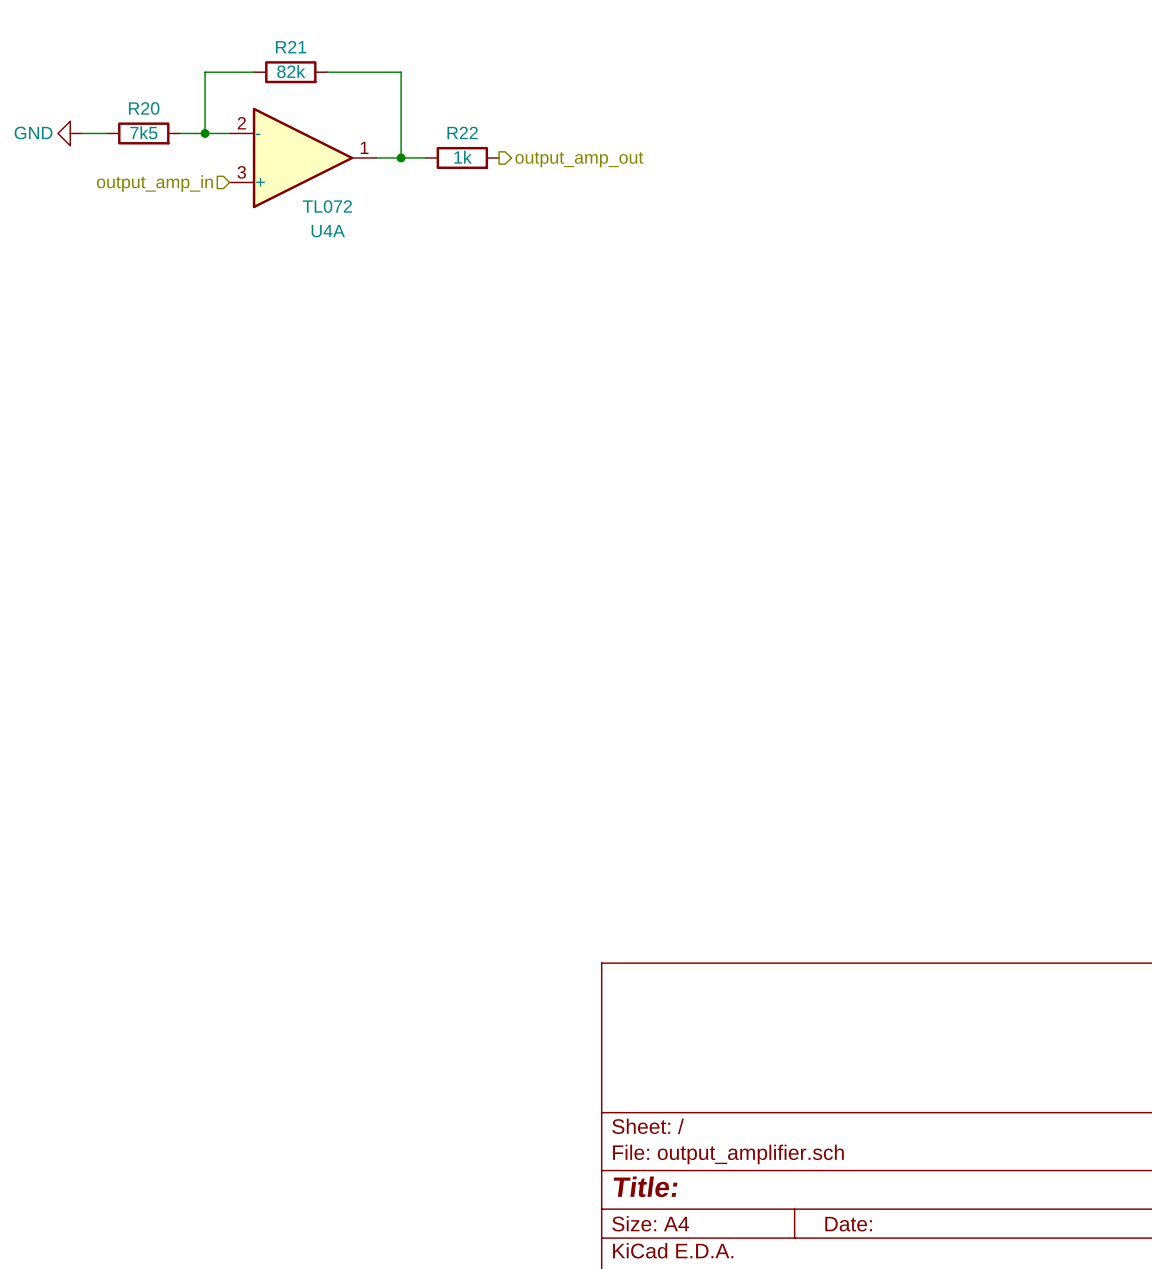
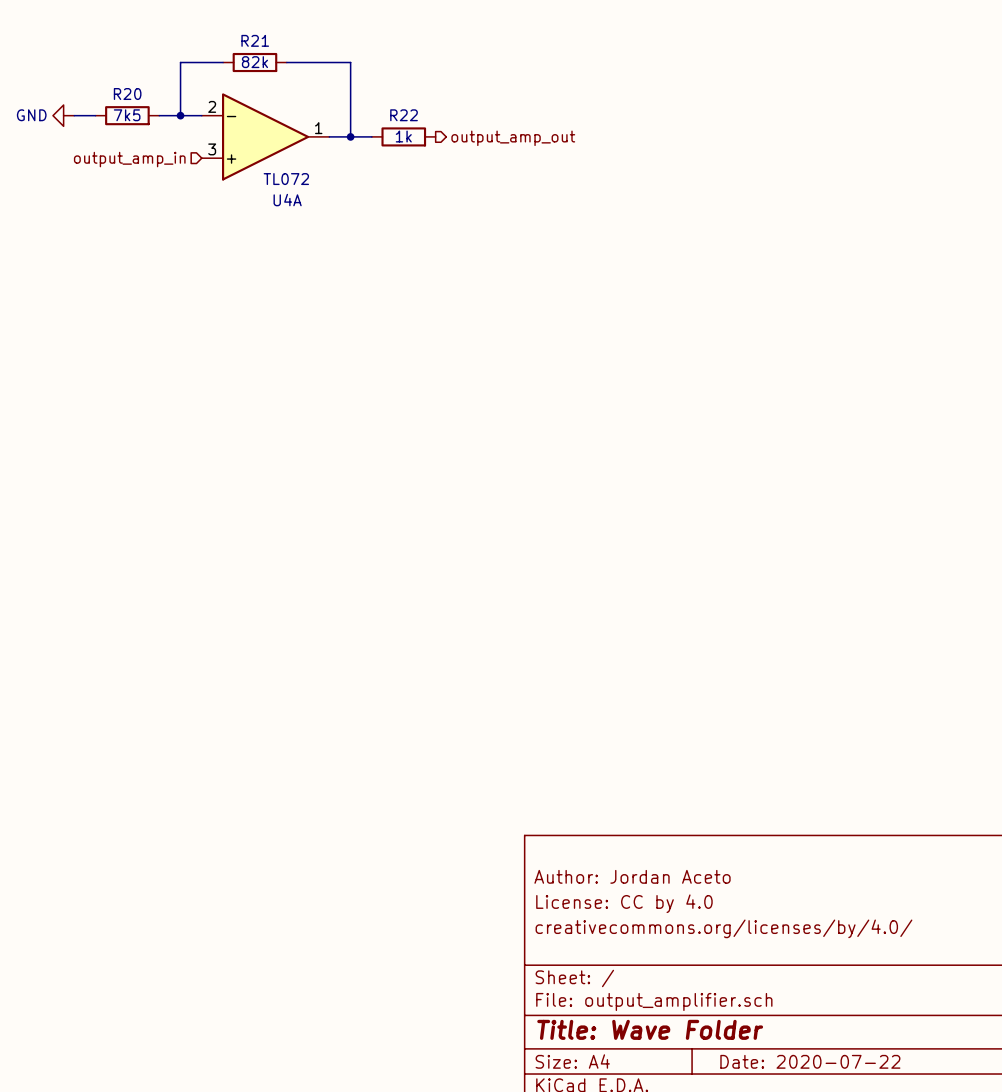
title block: none -> Author: Jordan Aceto (632, 876)
title block: none -> License: CC by 4.0 (624, 903)
title block: none -> creativecommons.org/licenses/by/4.0/ (723, 928)
title block: Title: (645, 1186) -> Title: Wave Folder (650, 1029)
title block: Date: (848, 1224) -> Date: 2020-07-22 (810, 1061)

